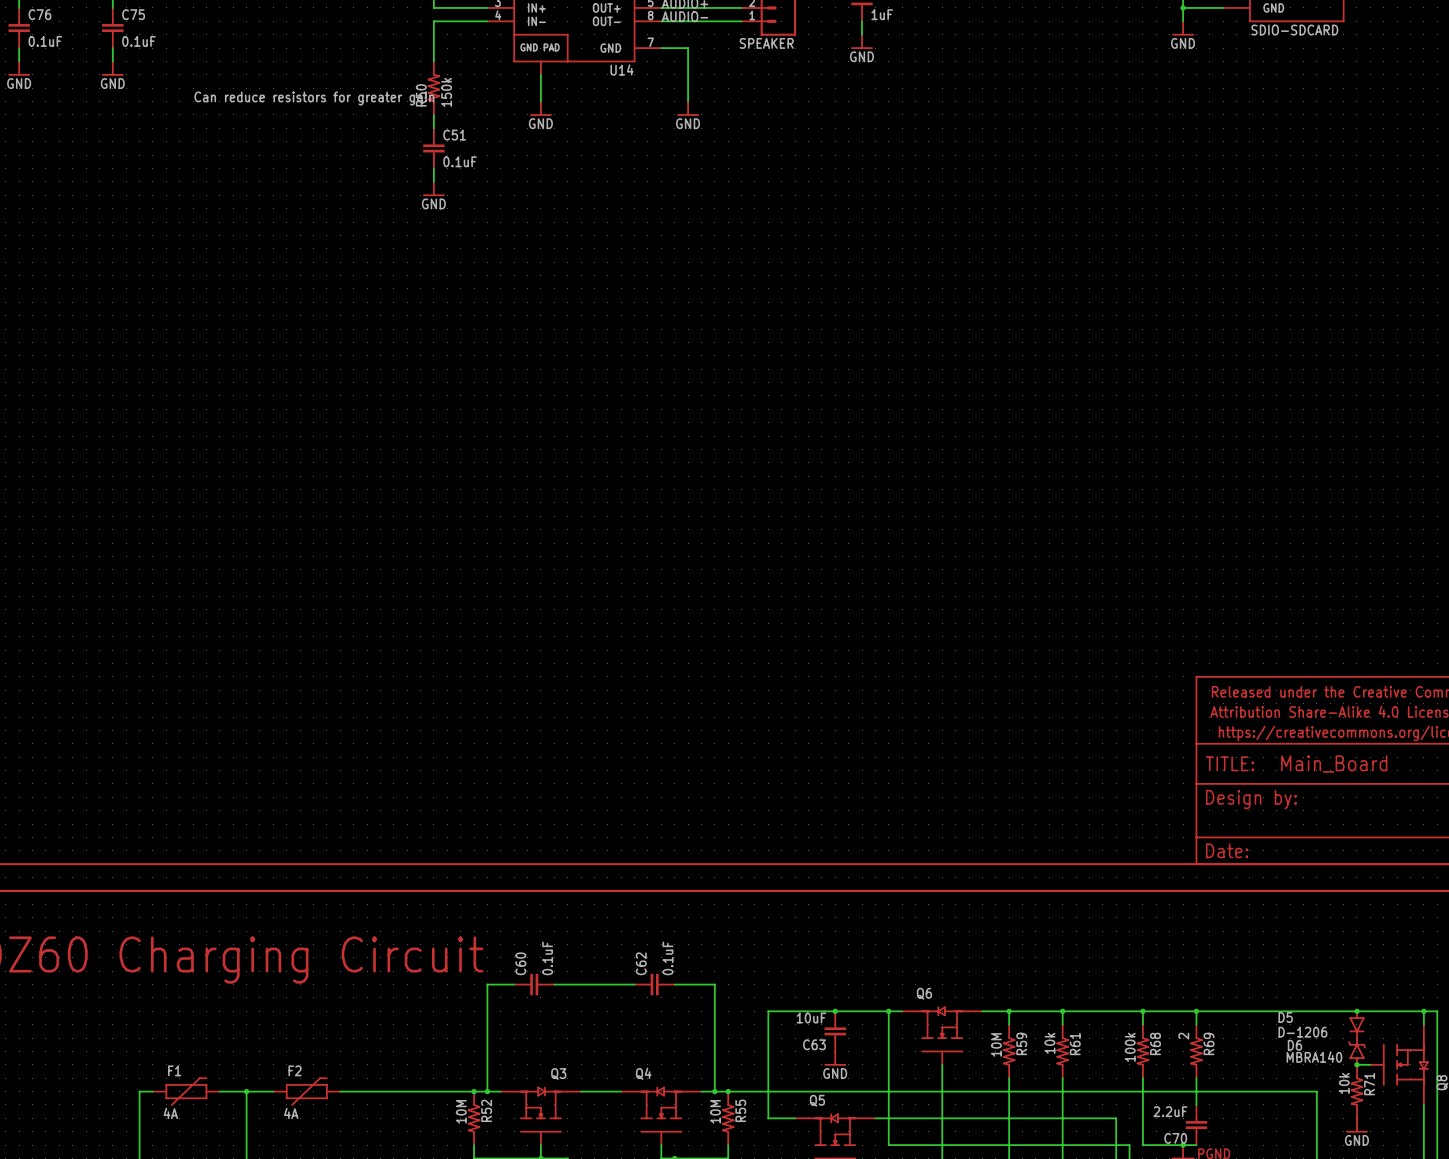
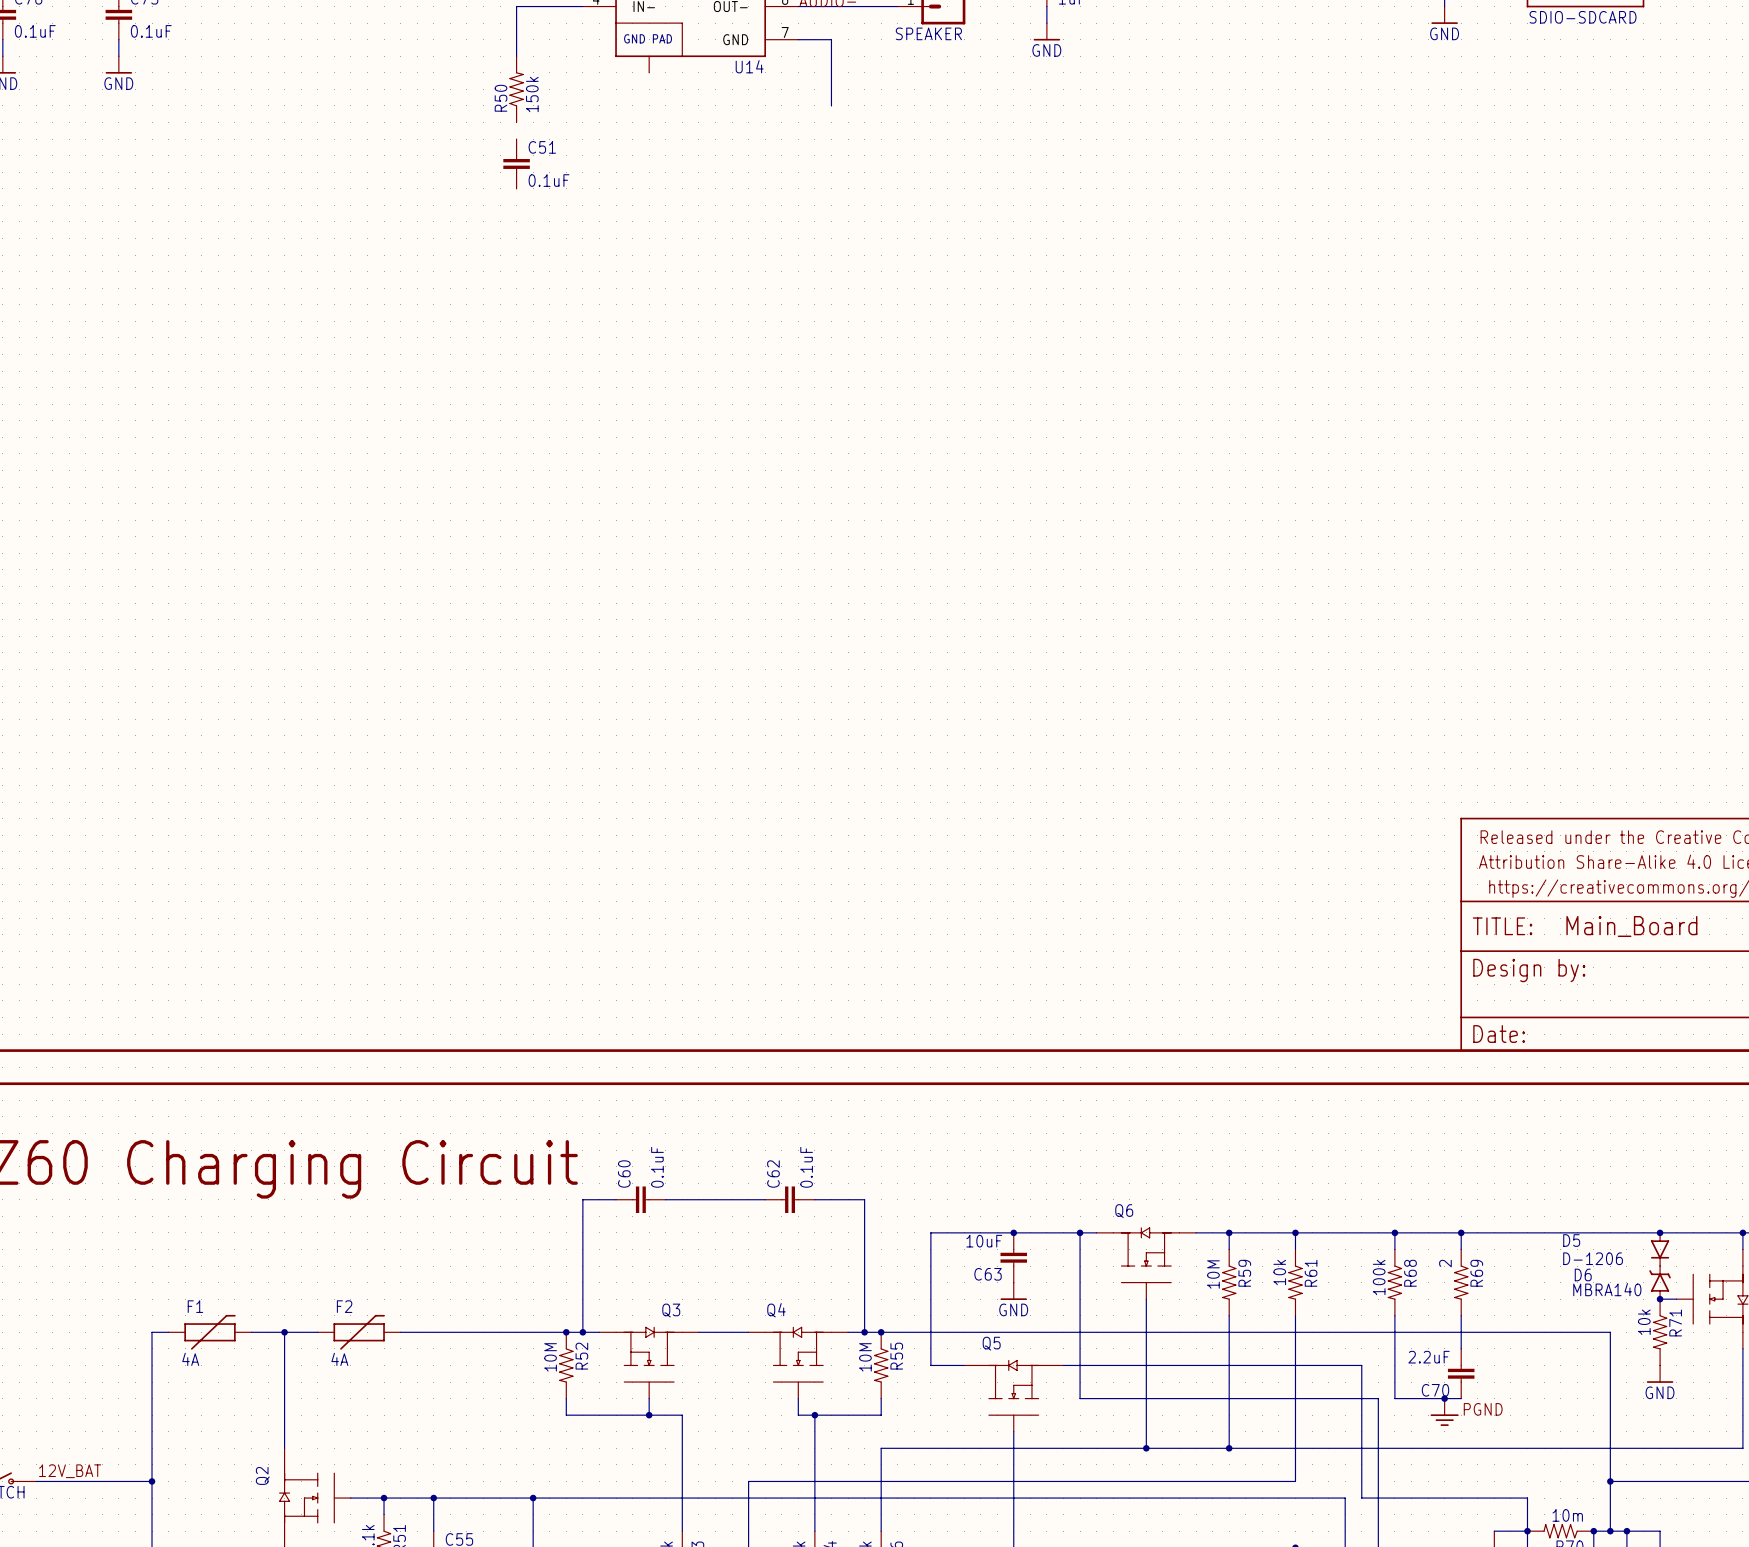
wire: (540, 74) (540, 101) -> none
text: Can reduce resistors for greater gain (314, 98) -> none
power symbol: GND (540, 108) -> none
power symbol: GND (688, 108) -> none
wire: (433, 114) (433, 128) -> none
wire: (433, 168) (433, 181) -> none
power symbol: GND (433, 188) -> none

